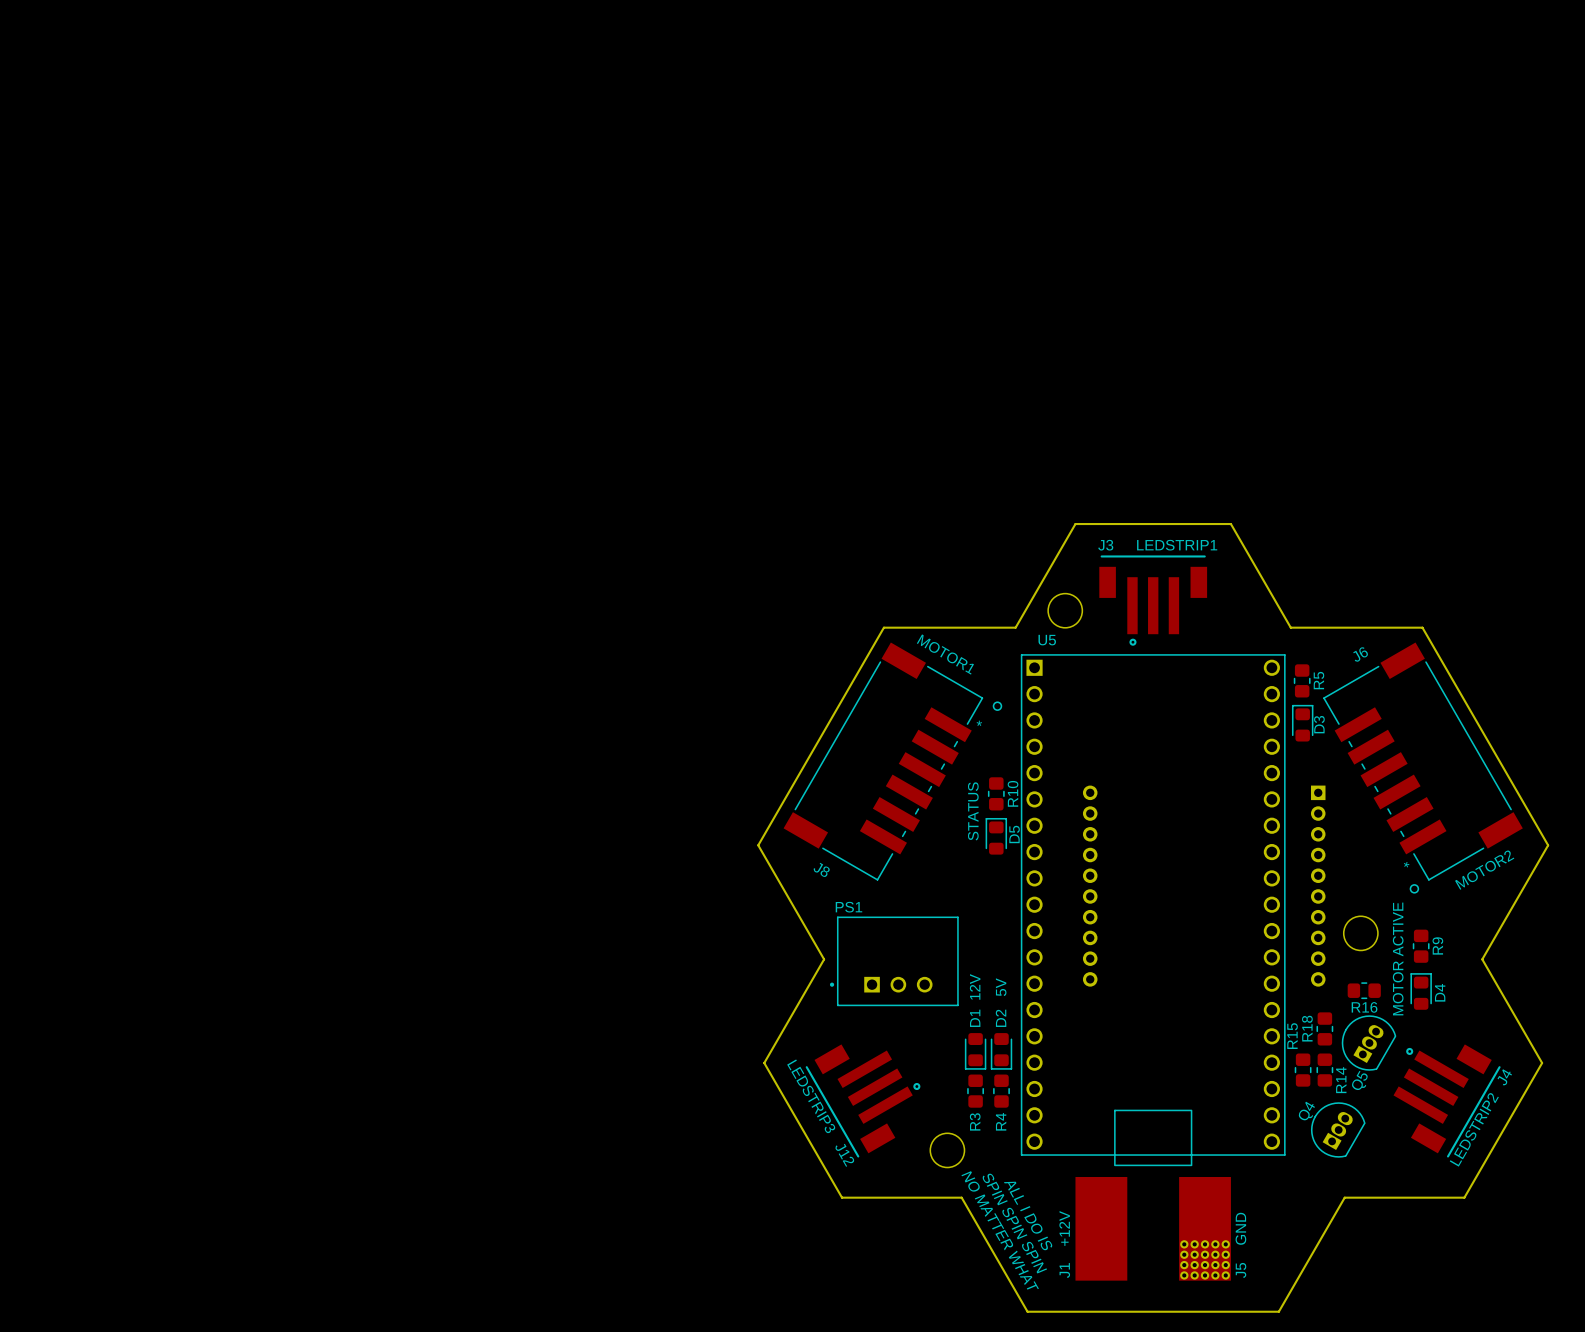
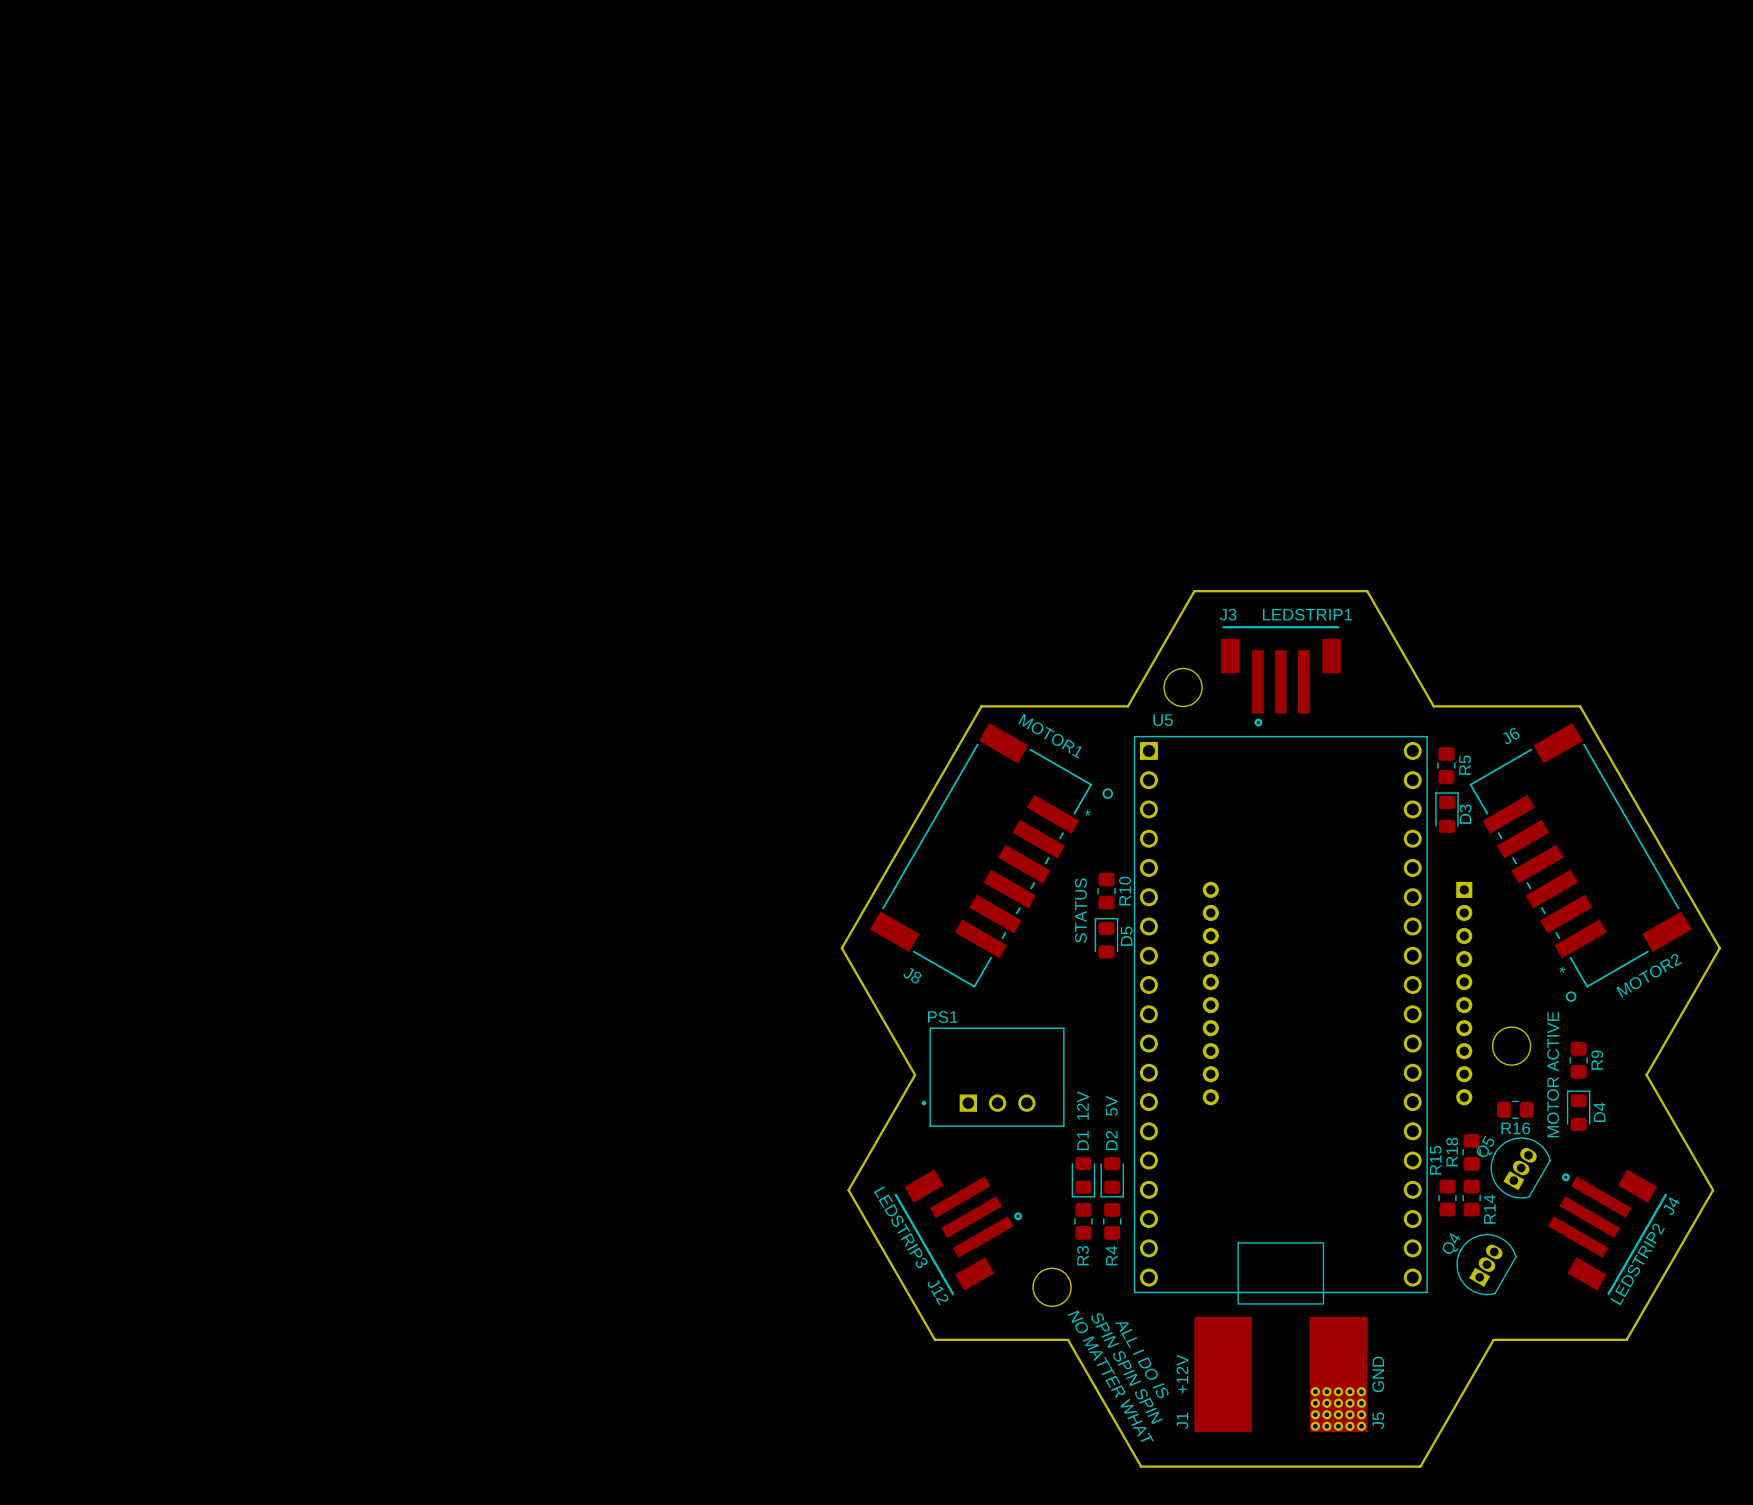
Q5 name position: Q5 (1359, 1080) -> Q5 (1485, 1146)

